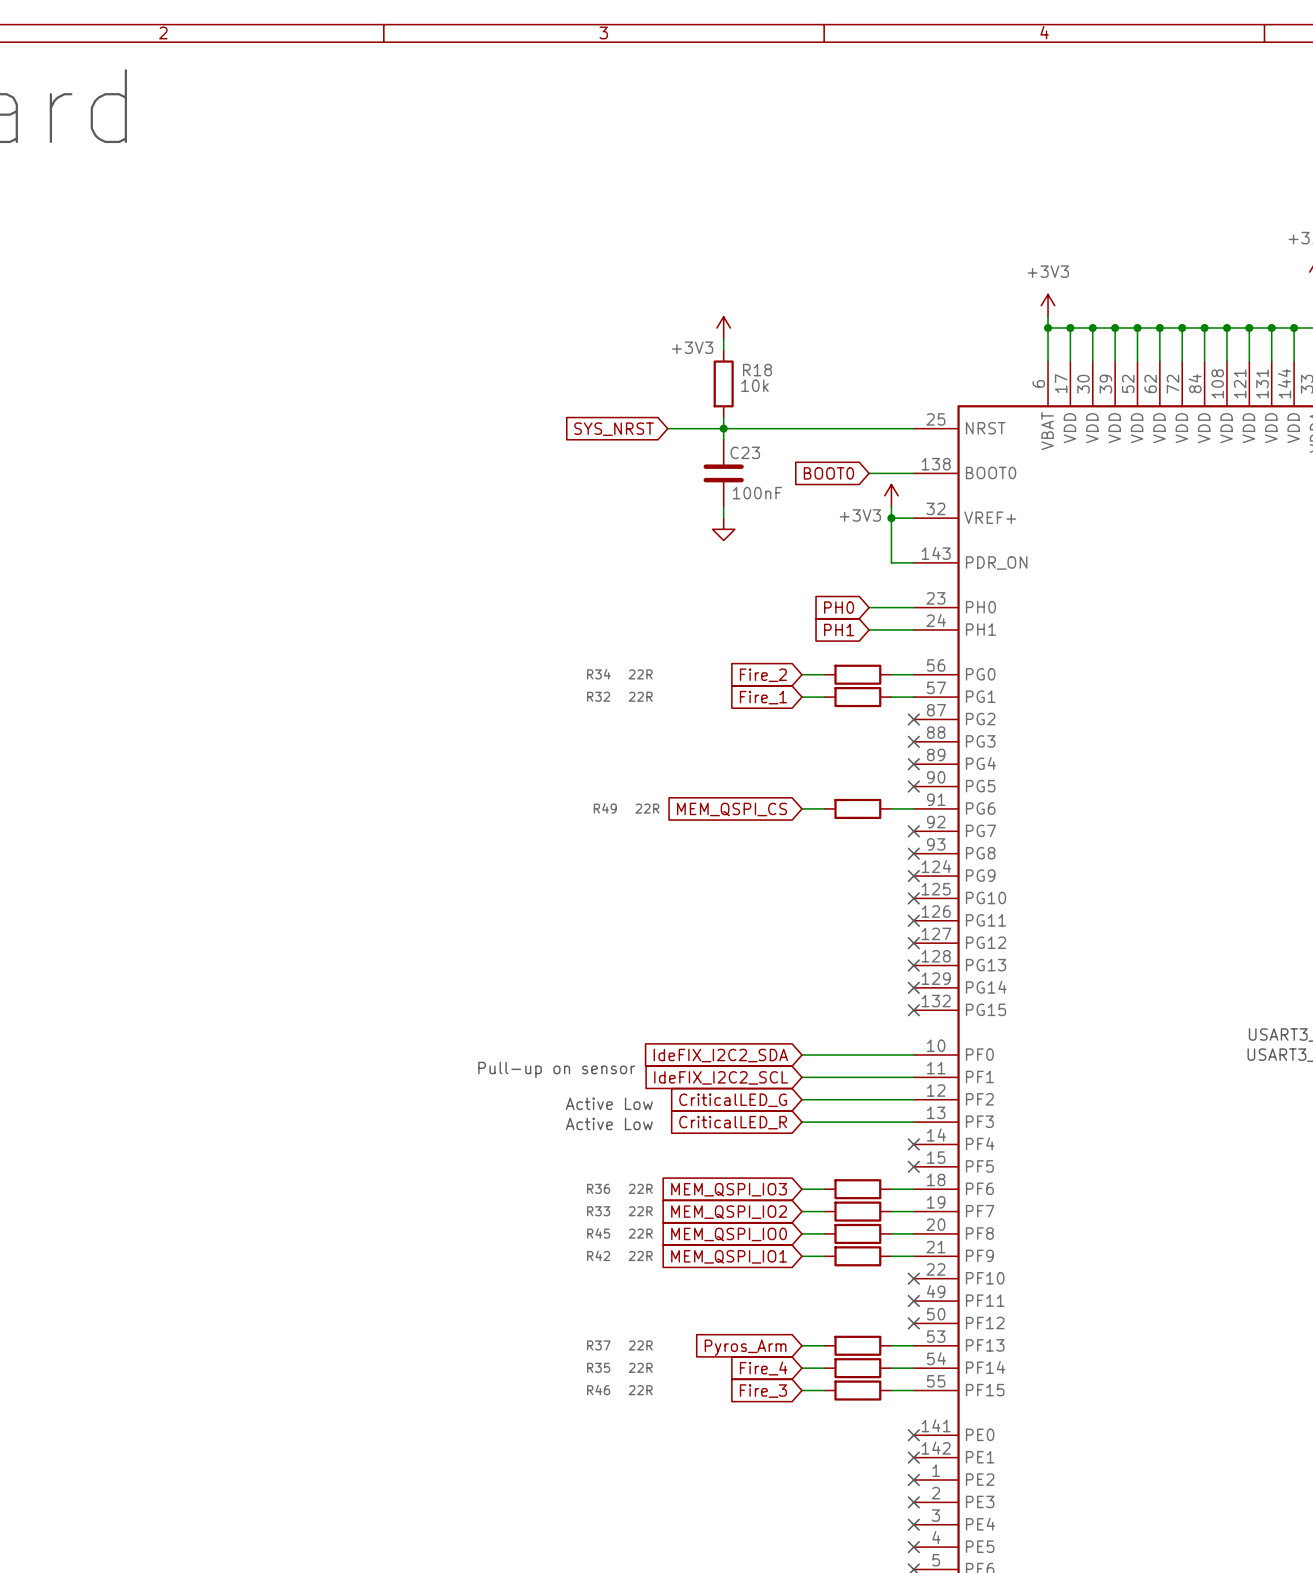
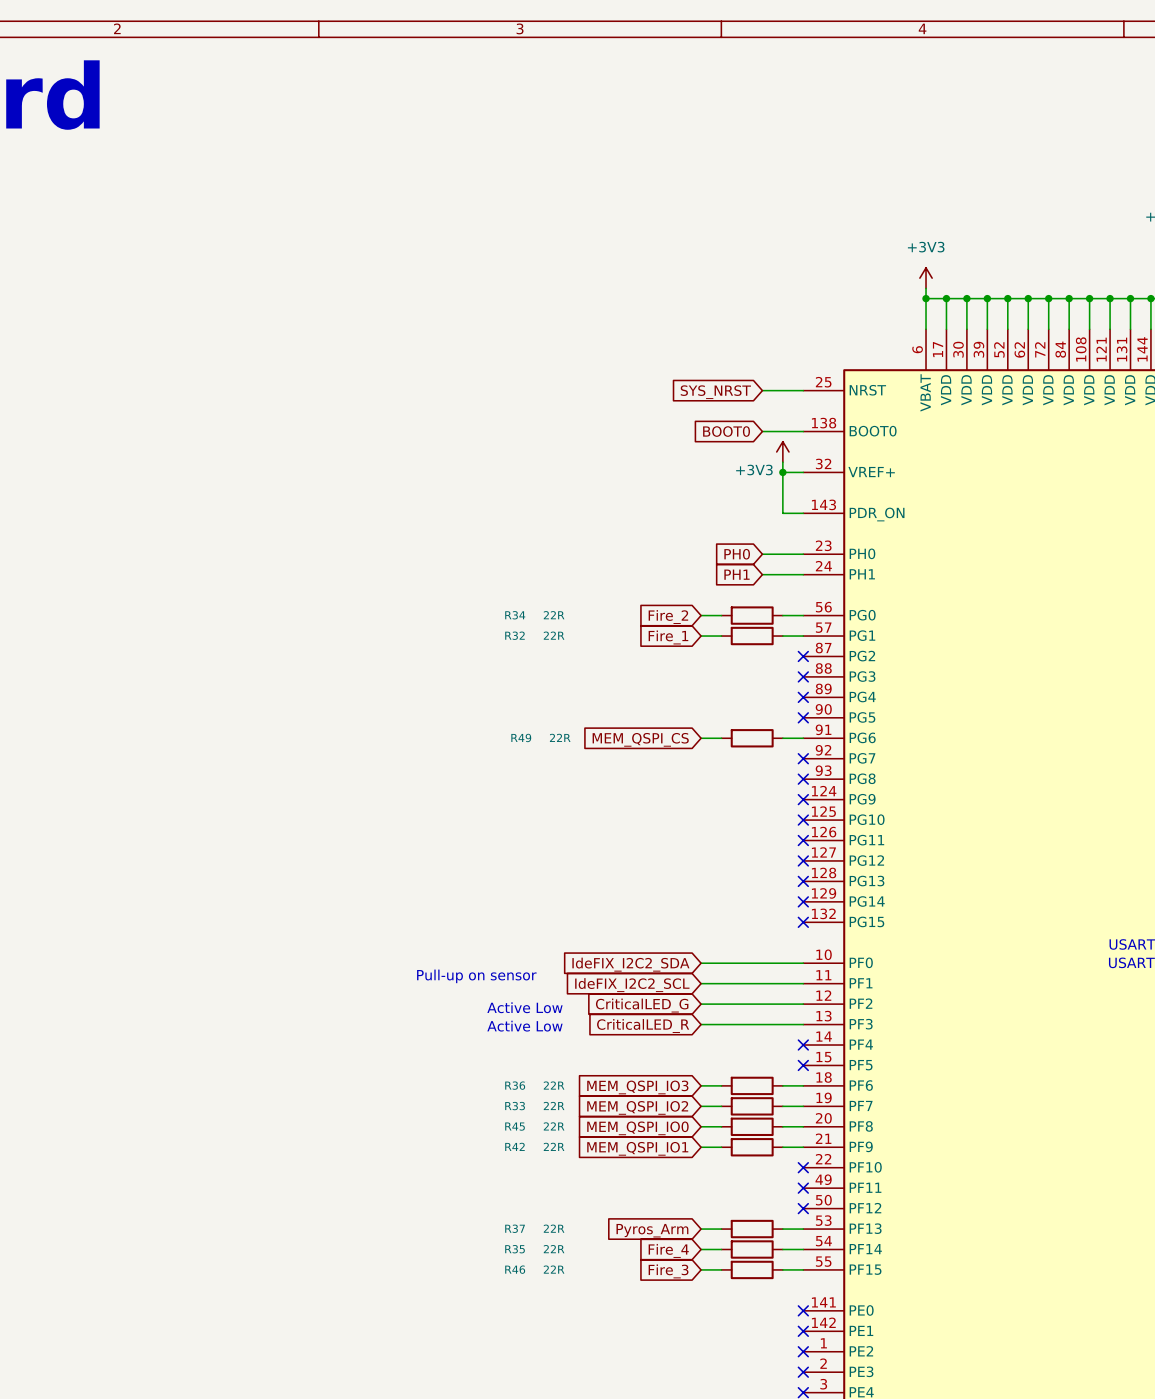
power symbol: +3V3 (723, 328) -> none
wire: (723, 339) (723, 350) -> none
R18: 10k (723, 383) -> none
wire: (723, 417) (723, 439) -> none
wire: (667, 428) (869, 428) -> none
junction: (723, 428) -> none
global label position: SYS_NRST (614, 429) -> SYS_NRST (715, 392)
C23: 100nF (723, 473) -> none
wire: (723, 506) (723, 518) -> none
power symbol: (723, 529) -> none

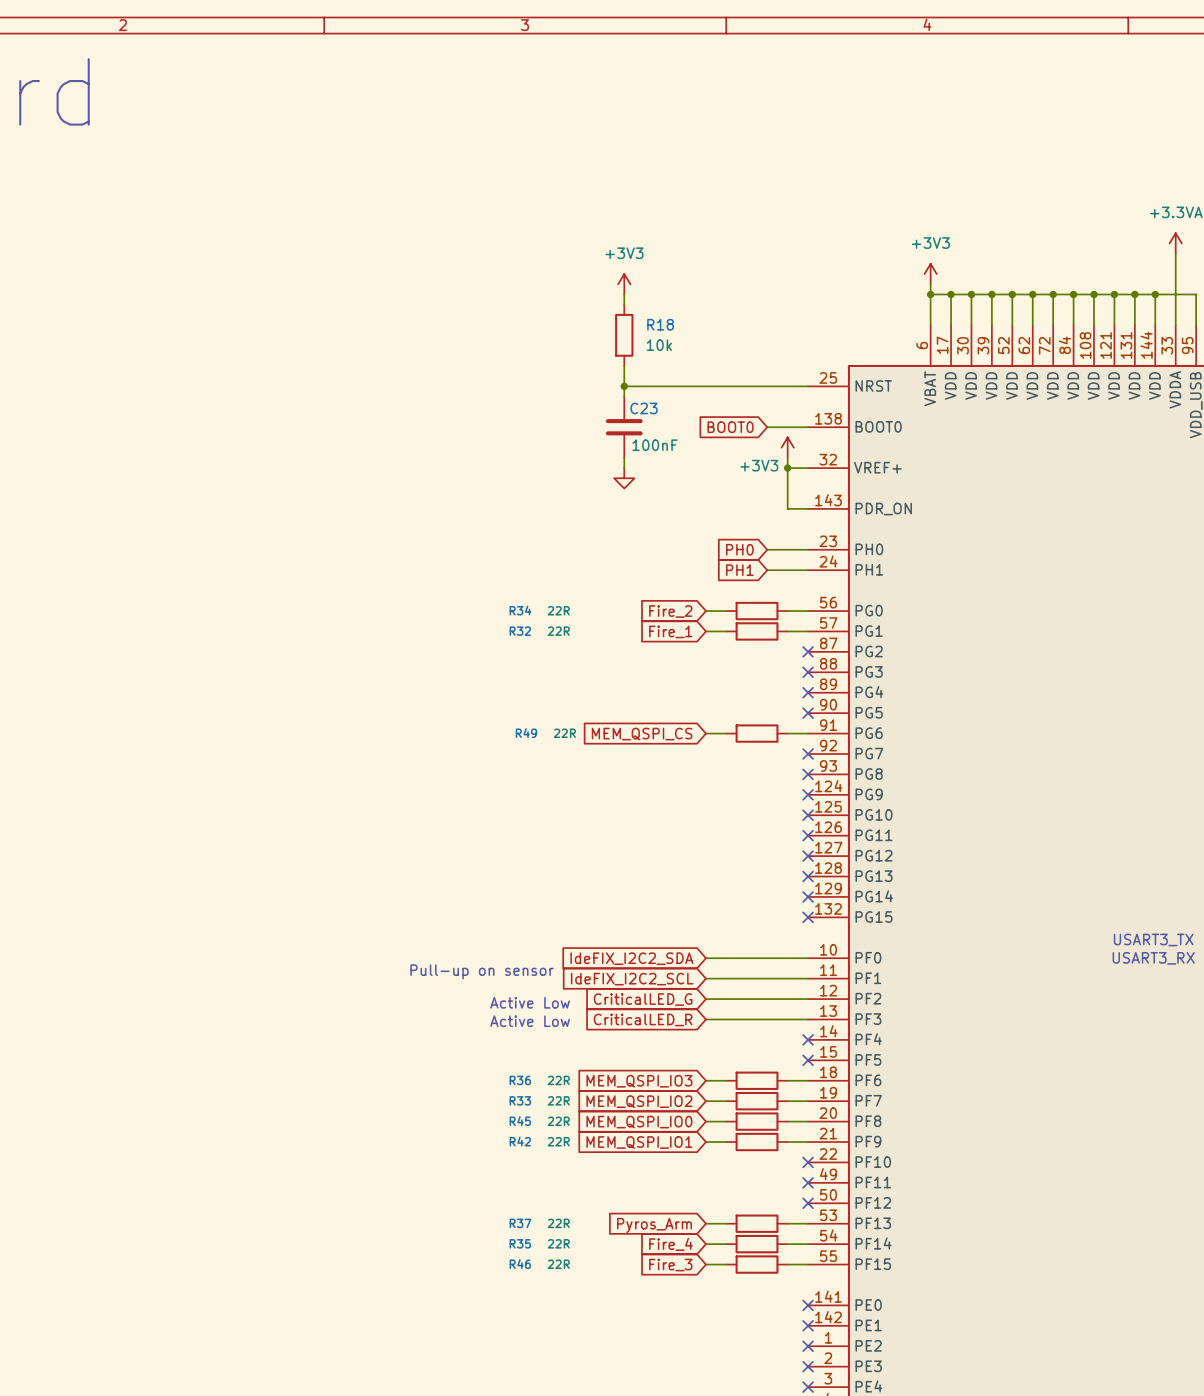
power symbol: none -> +3V3 (624, 284)
wire: none -> (624, 294) (624, 304)
R18: none -> 10k (624, 335)
wire: none -> (624, 365) (624, 396)
wire: none -> (624, 386) (767, 386)
junction: none -> (624, 386)
global label: SYS_NRST (715, 392) -> none
C23: none -> 100nF (624, 427)
wire: none -> (624, 457) (624, 468)
power symbol: none -> (624, 478)

